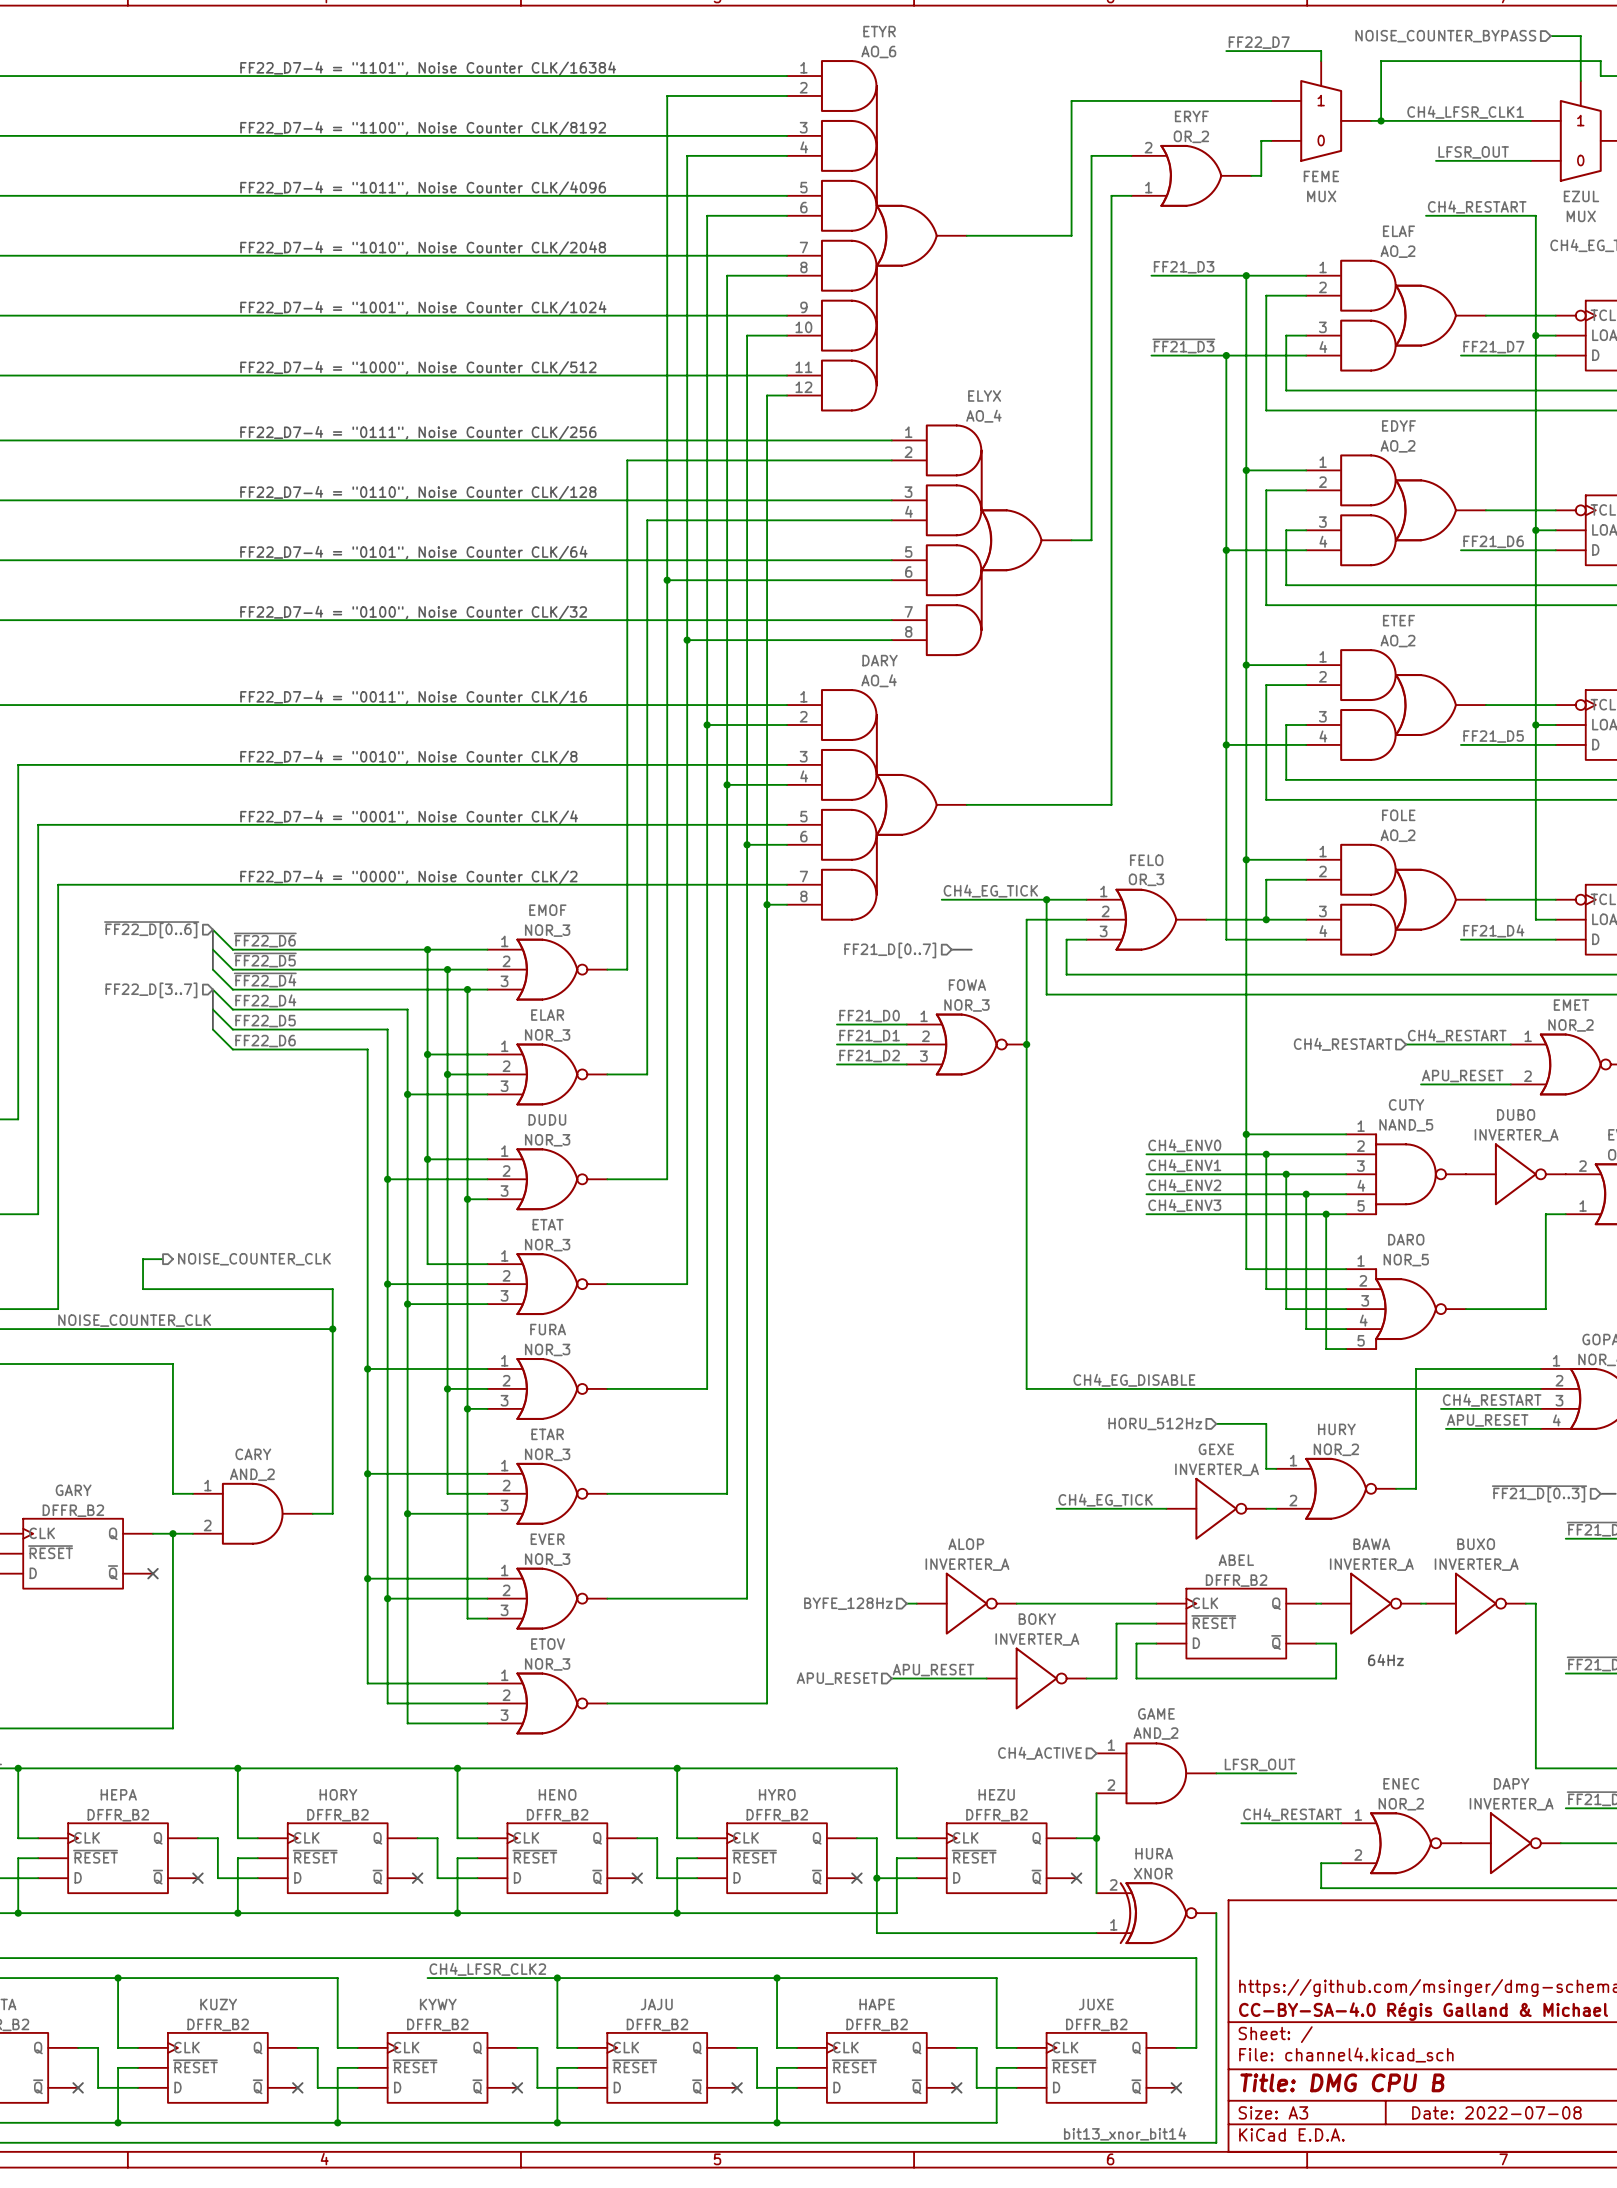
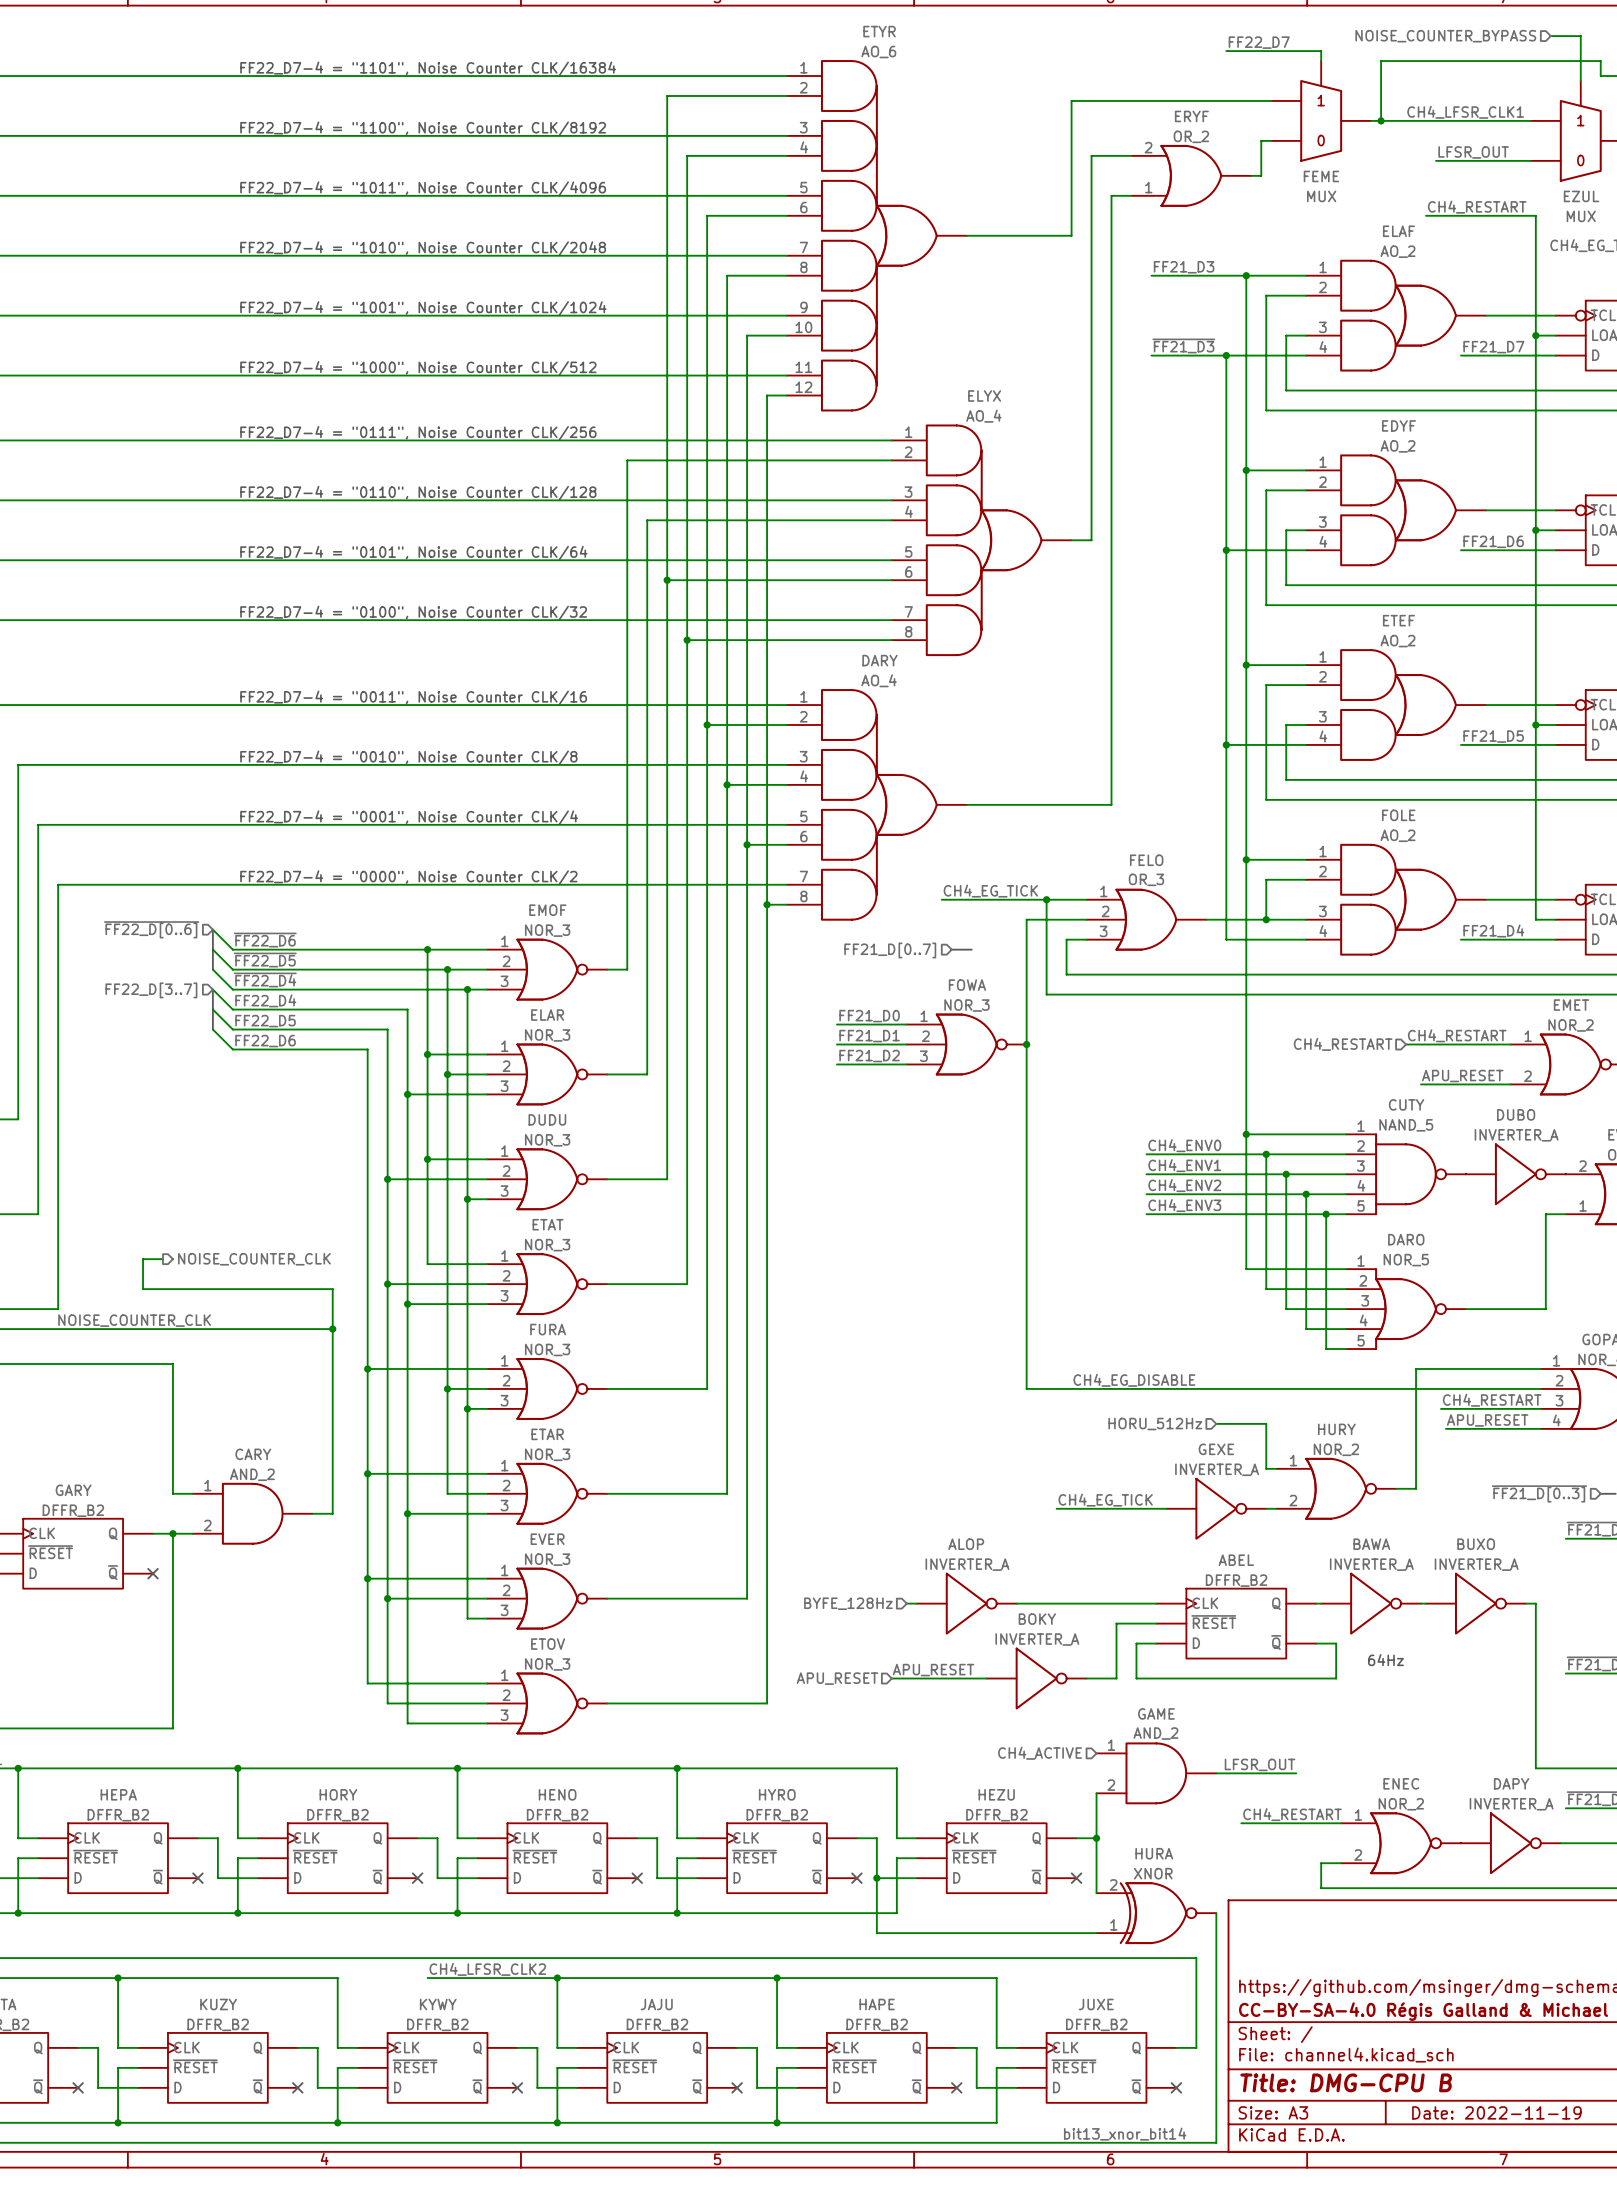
title block: Title: DMG CPU B (1342, 2082) -> Title: DMG-CPU B (1346, 2082)
title block: Date: 2022-07-08 (1496, 2112) -> Date: 2022-11-19 (1496, 2112)

